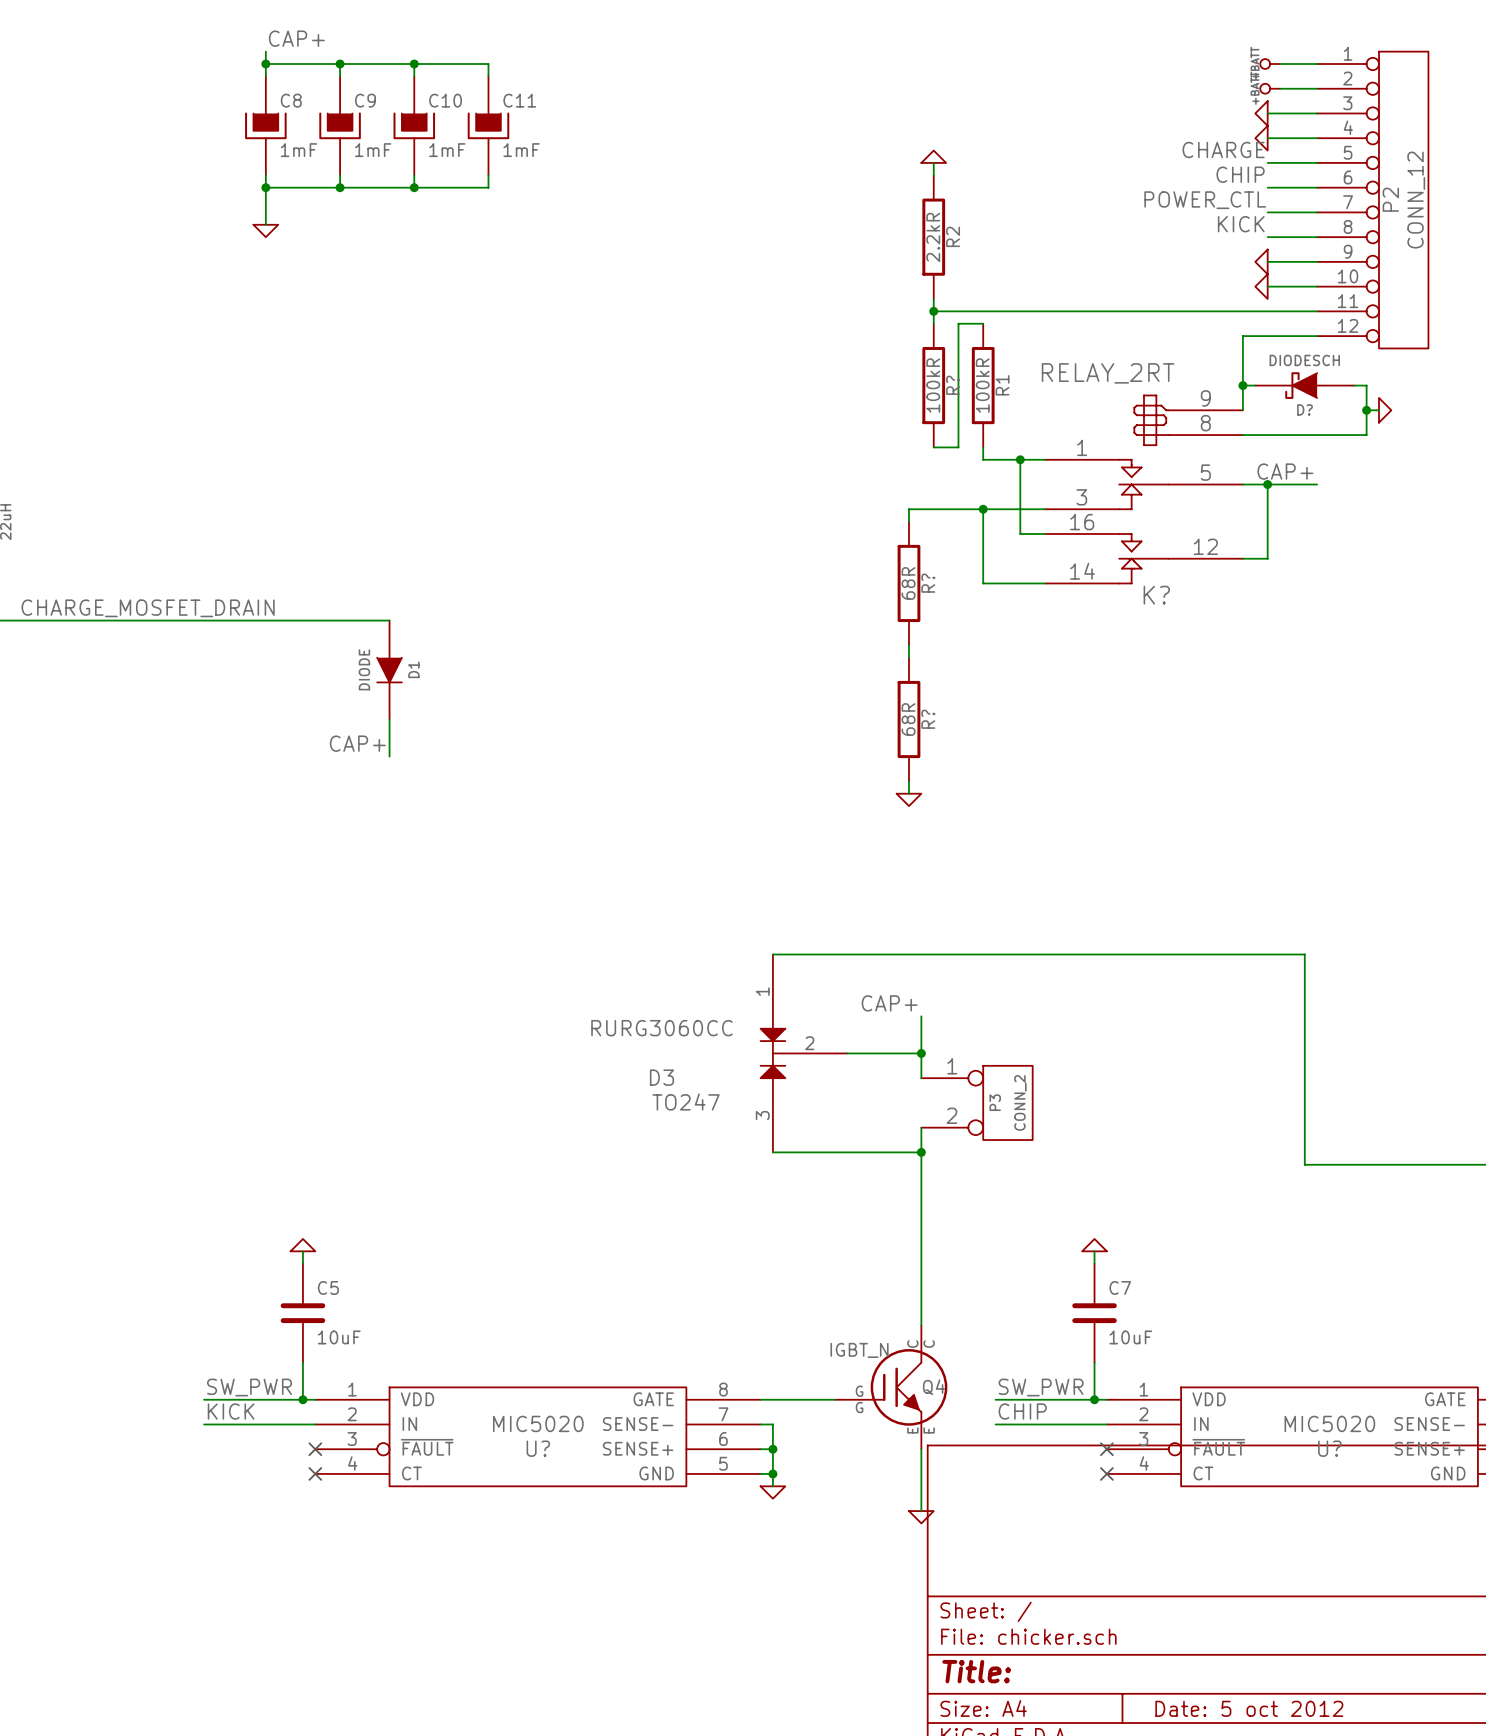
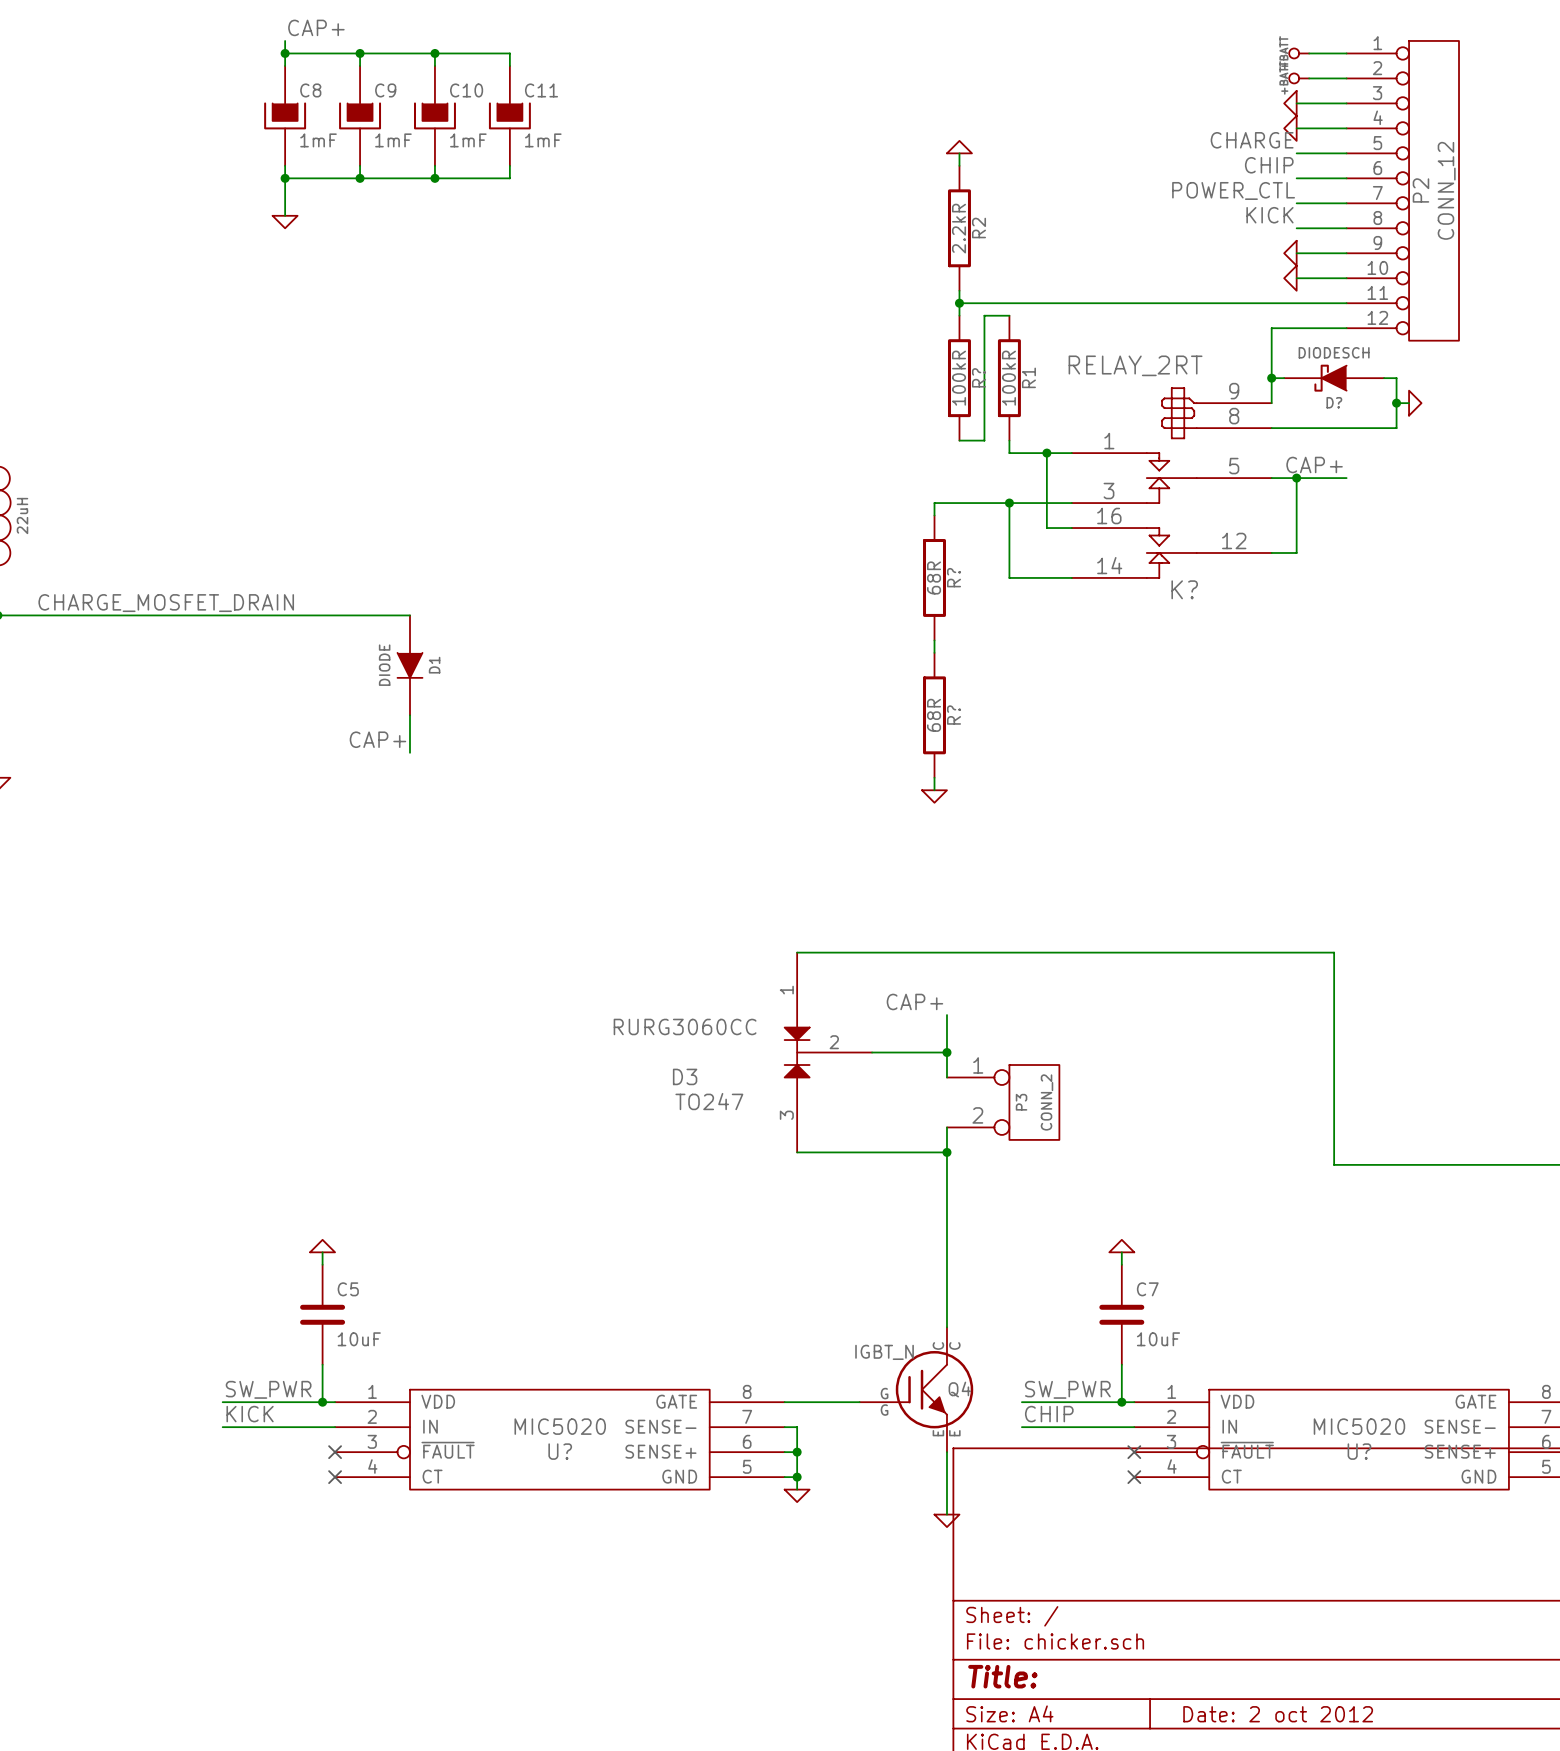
title block: Date: 5 oct 2012 (1249, 1708) -> Date: 2 oct 2012 (1278, 1714)

